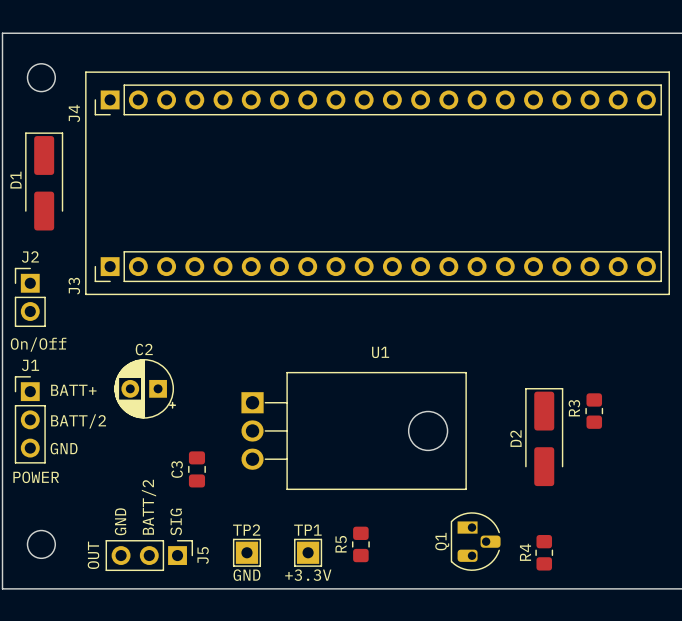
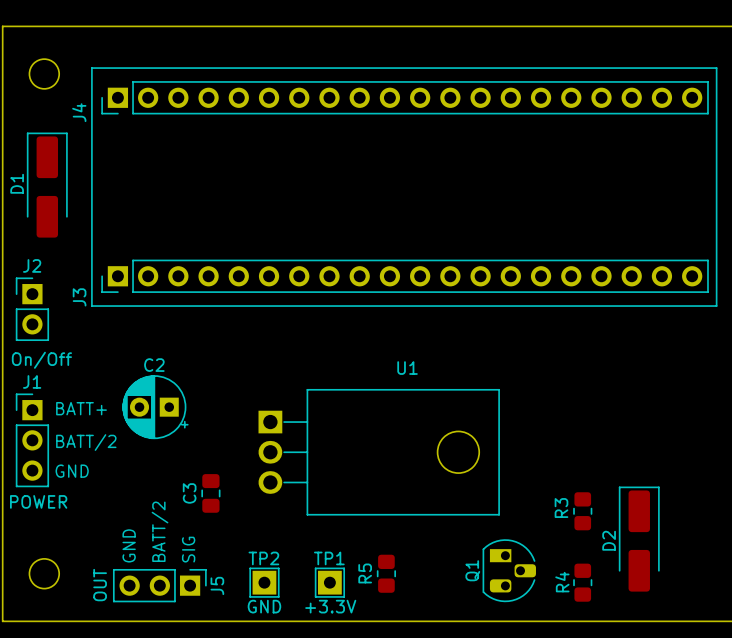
R3 position: (594, 411) -> (582, 511)
D2 position: (544, 437) -> (639, 539)

